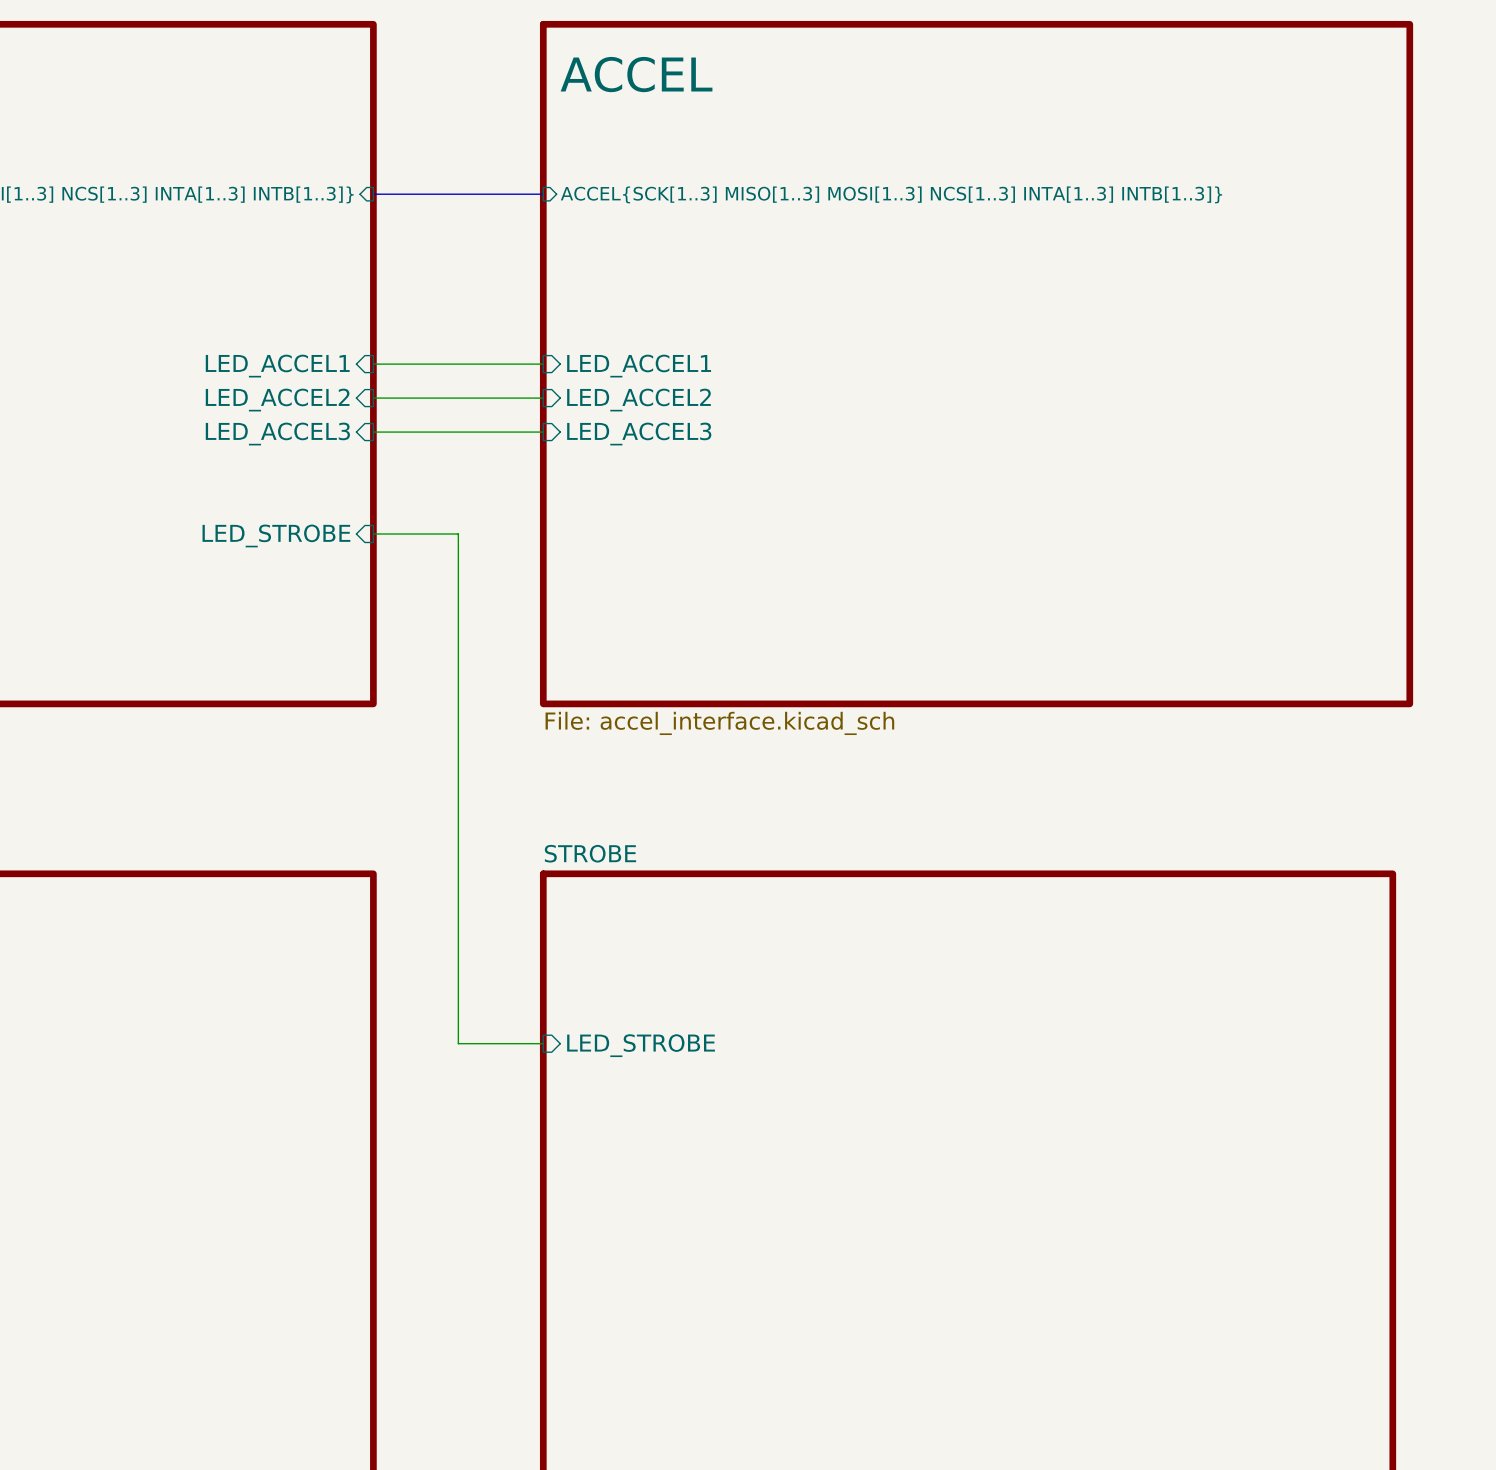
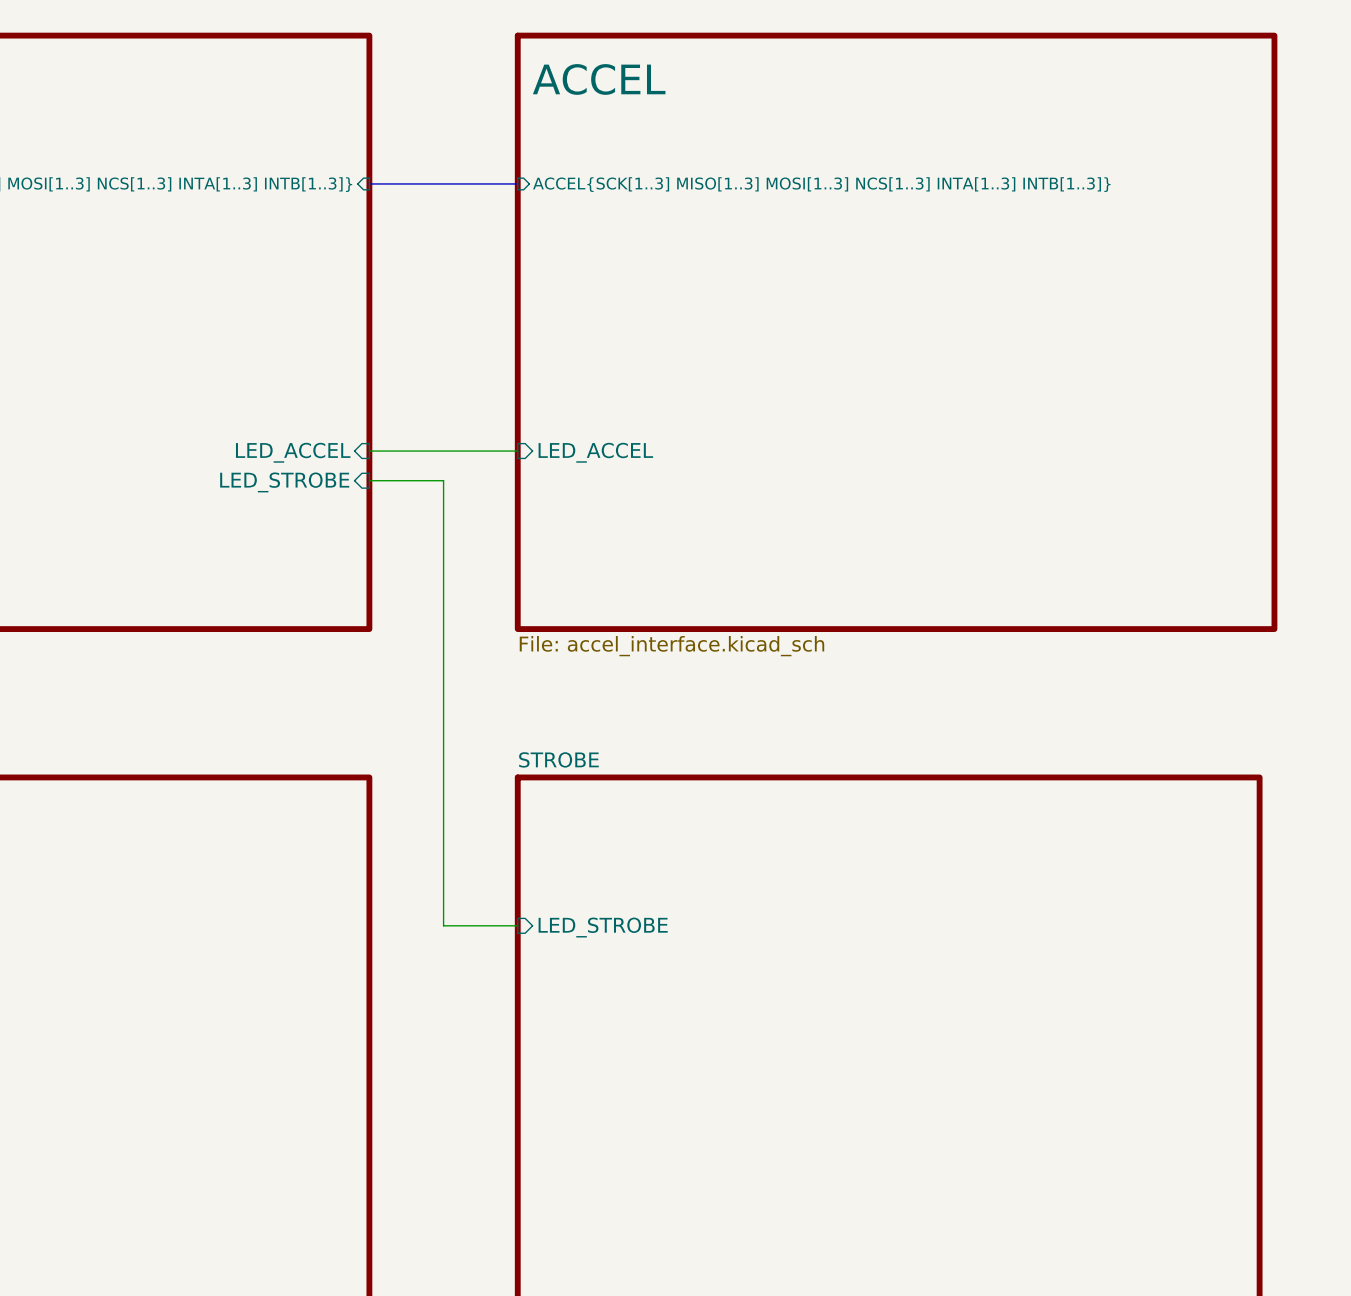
wire: (373, 364) (543, 364) -> none
sheet pin: LED_ACCEL1 (277, 366) -> none
sheet pin: LED_ACCEL1 (639, 366) -> none
wire: (373, 398) (543, 398) -> none
sheet pin: LED_ACCEL2 (277, 400) -> none
sheet pin: LED_ACCEL2 (639, 400) -> none
wire: (373, 432) (543, 432) -> (369, 451) (517, 451)
sheet pin: LED_ACCEL3 (277, 434) -> none
sheet pin: LED_ACCEL3 (639, 434) -> none
sheet pin: none -> LED_ACCEL (293, 452)
sheet pin: none -> LED_ACCEL (595, 452)

